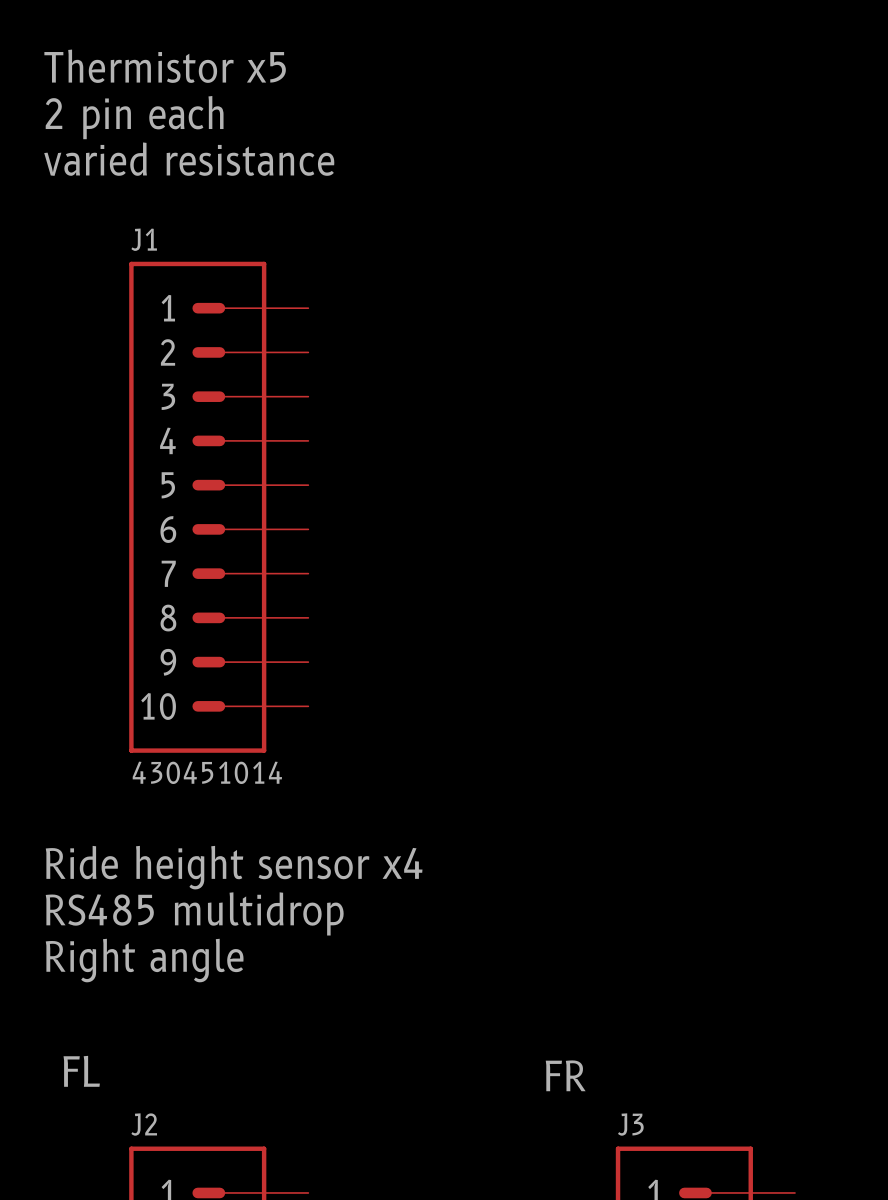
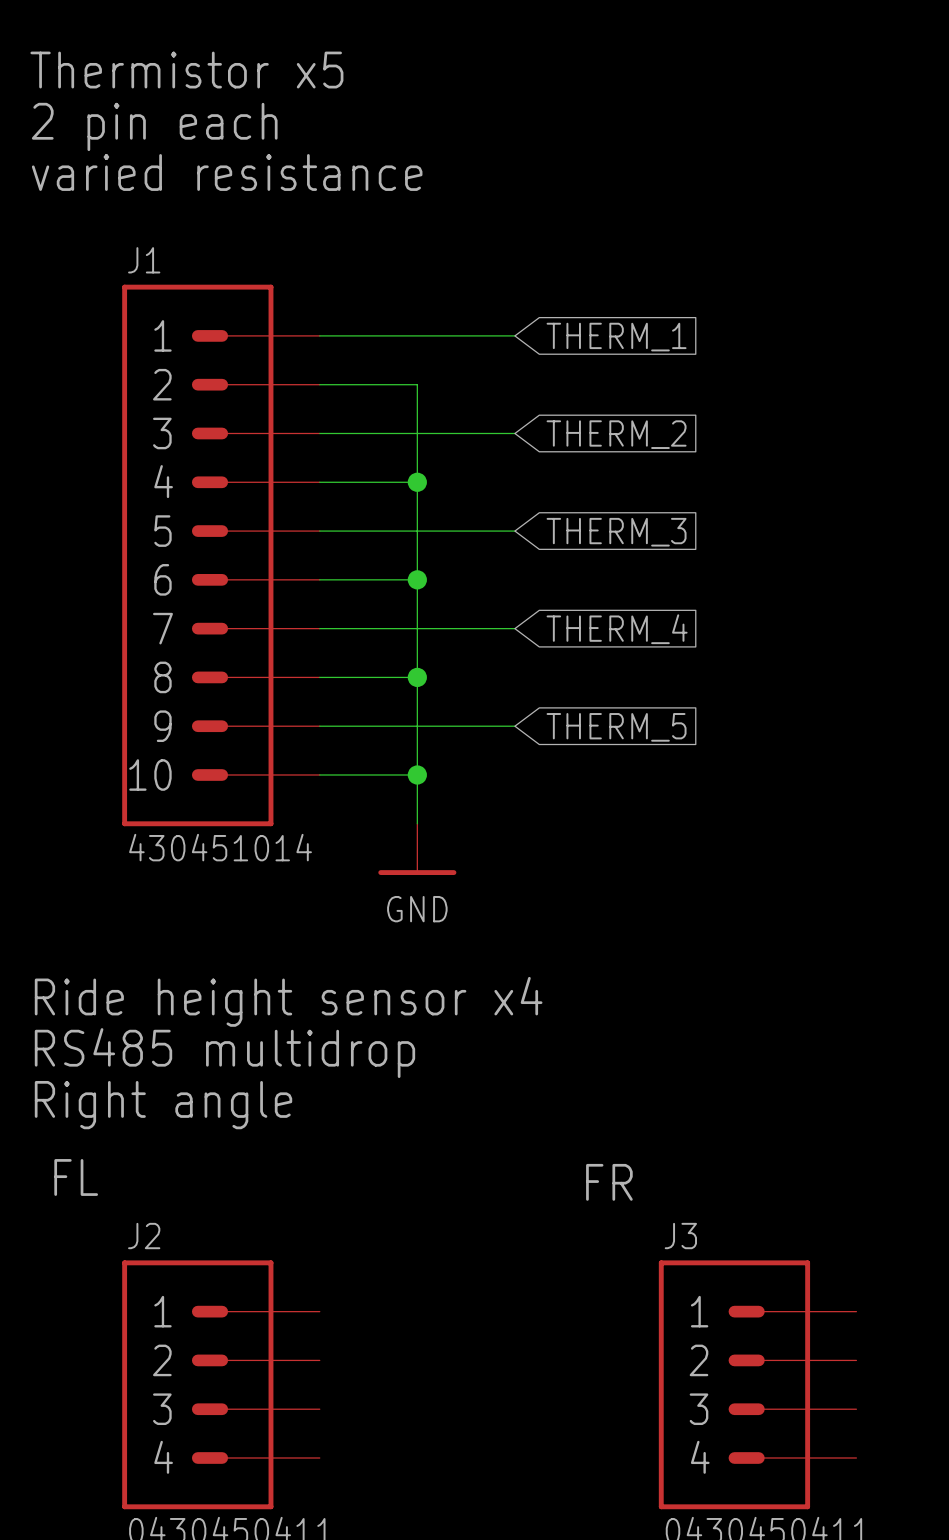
wire: none -> (319, 335) (514, 335)
global label: none -> THERM_1 (616, 337)
wire: none -> (319, 384) (417, 384) (417, 823)
wire: none -> (319, 433) (514, 433)
global label: none -> THERM_2 (616, 434)
wire: none -> (319, 482) (417, 482)
junction: none -> (417, 482)
wire: none -> (319, 531) (514, 531)
global label: none -> THERM_3 (616, 532)
wire: none -> (319, 579) (417, 579)
junction: none -> (417, 579)
wire: none -> (319, 628) (514, 628)
global label: none -> THERM_4 (617, 629)
wire: none -> (319, 677) (417, 677)
junction: none -> (417, 677)
wire: none -> (319, 726) (514, 726)
global label: none -> THERM_5 (616, 727)
wire: none -> (319, 774) (417, 774)
junction: none -> (417, 774)
power symbol: none -> GND (417, 849)
text position: Ride height sensor x4 (234, 867) -> Ride height sensor x4 (288, 1001)
text position: RS485 multidrop (194, 913) -> RS485 multidrop (224, 1053)
text position: Right angle (144, 960) -> Right angle (163, 1105)

